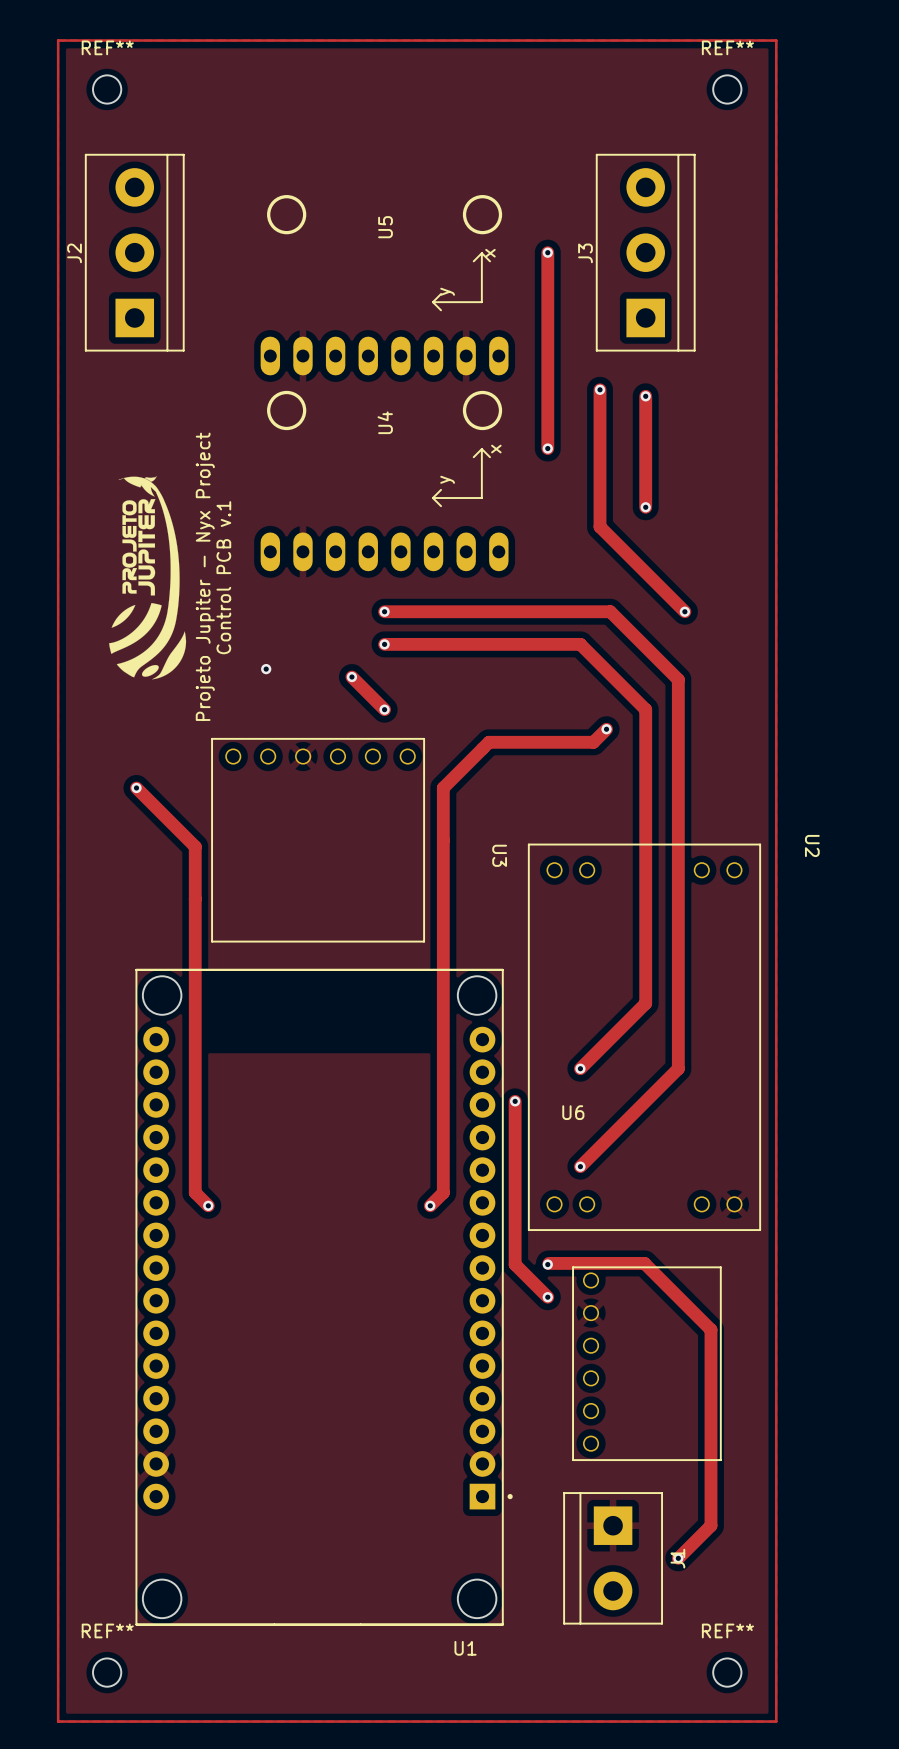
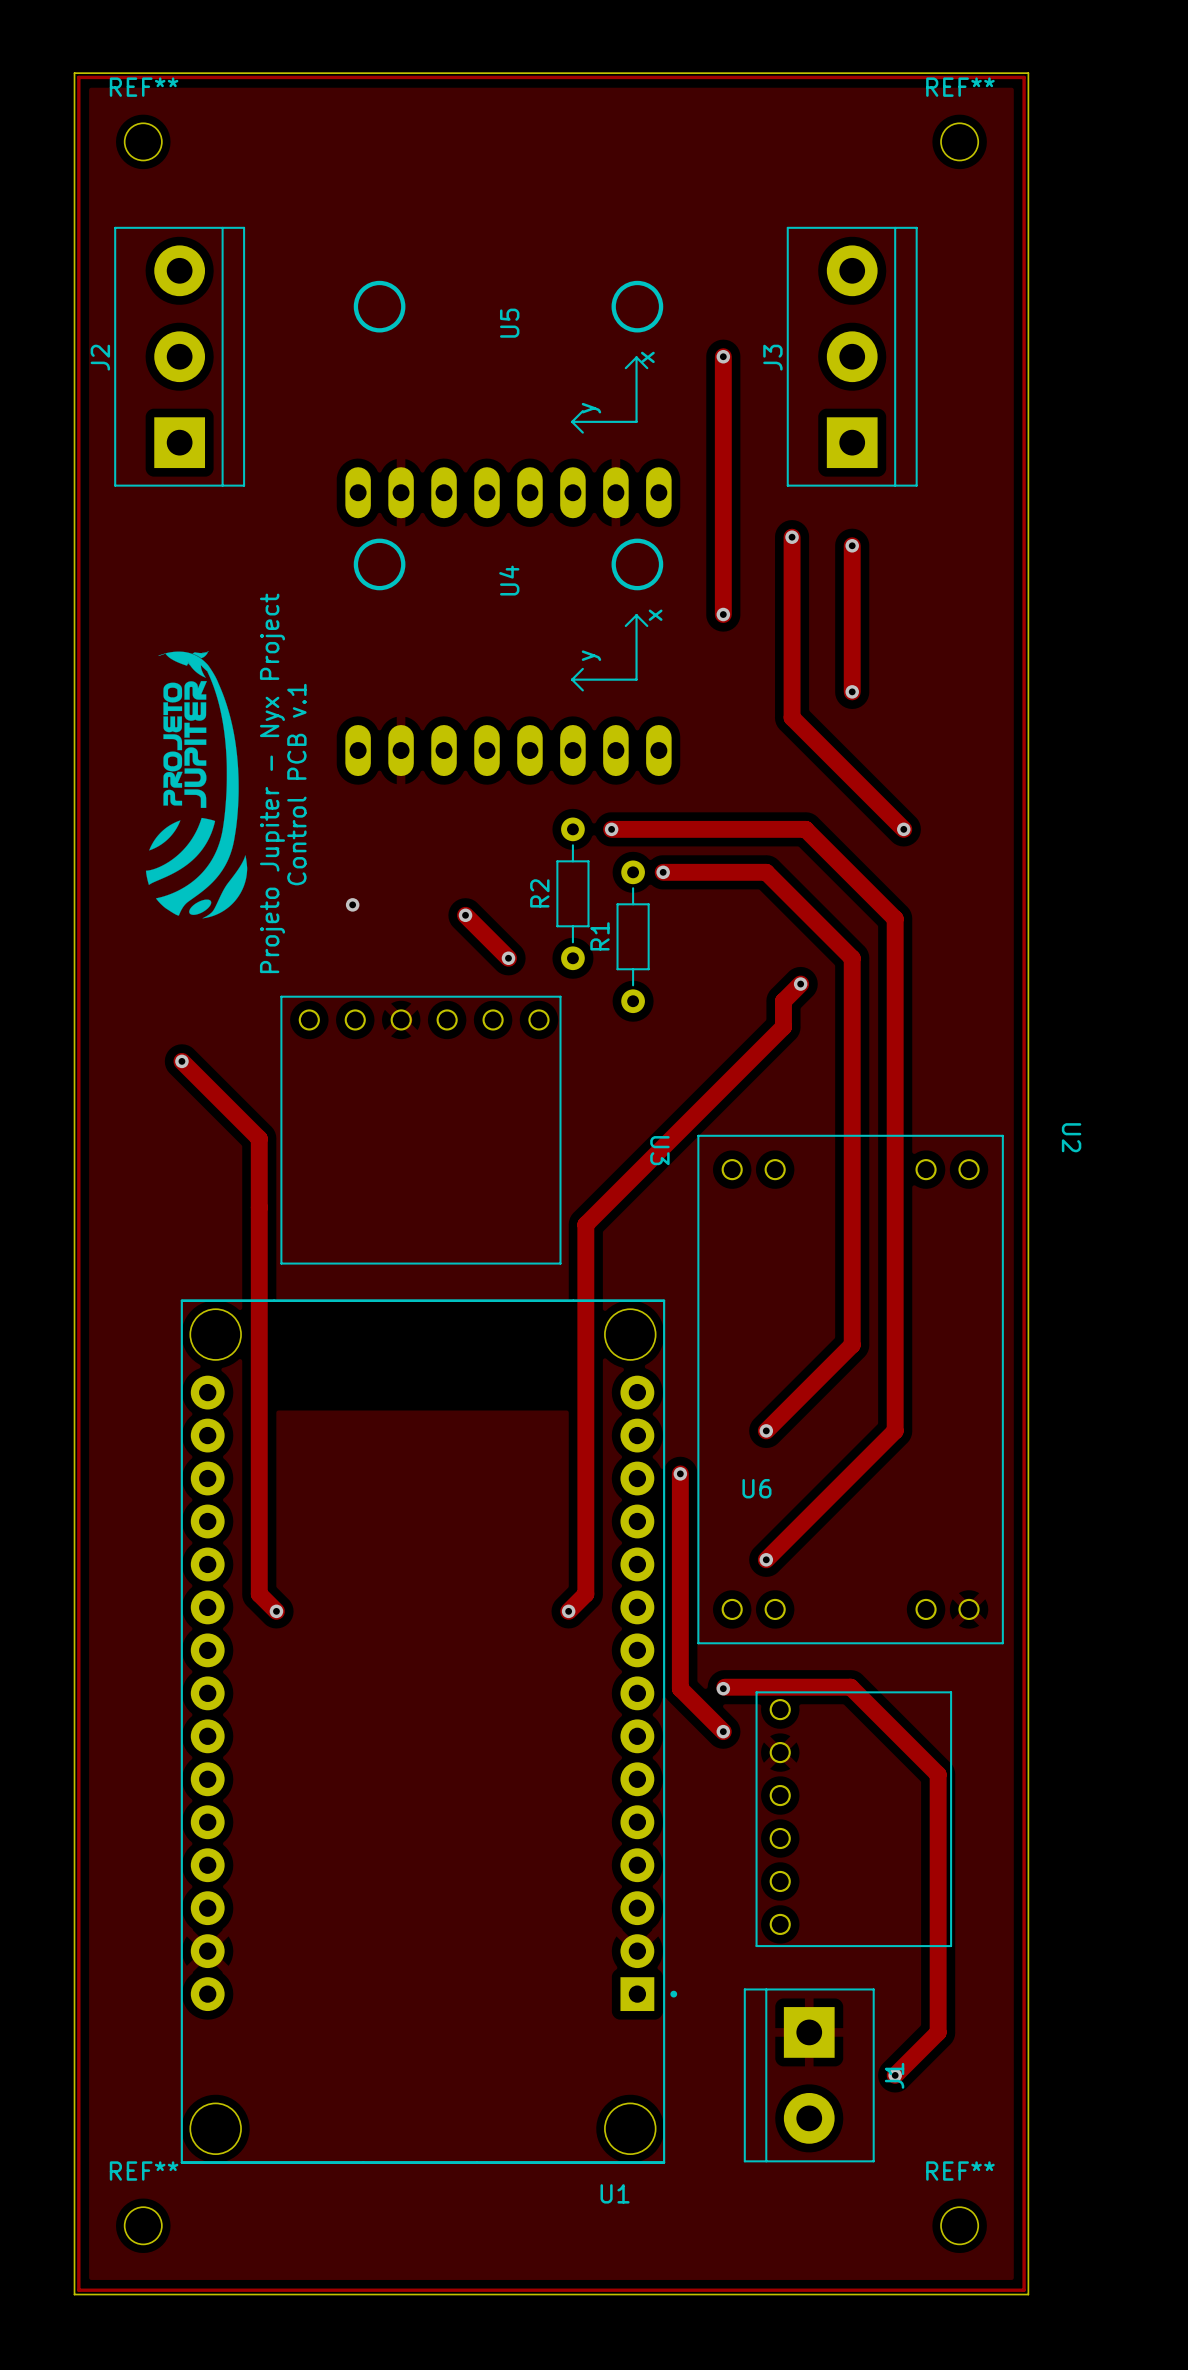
board edge: none -> (74, 73) (1028, 73) (1028, 2294) (74, 2294) (74, 73)
track: (384, 611) (462, 611) -> none
via: (384, 611) -> none
via: none -> (611, 829)
track: (384, 644) (502, 644) -> none
via: (384, 644) -> none
via: none -> (663, 872)
R2: none -> (572, 893)
R1: none -> (633, 936)
track: (593, 742) (489, 742) (443, 788) (443, 912) -> (783, 1001) (783, 1027) (585, 1224)

